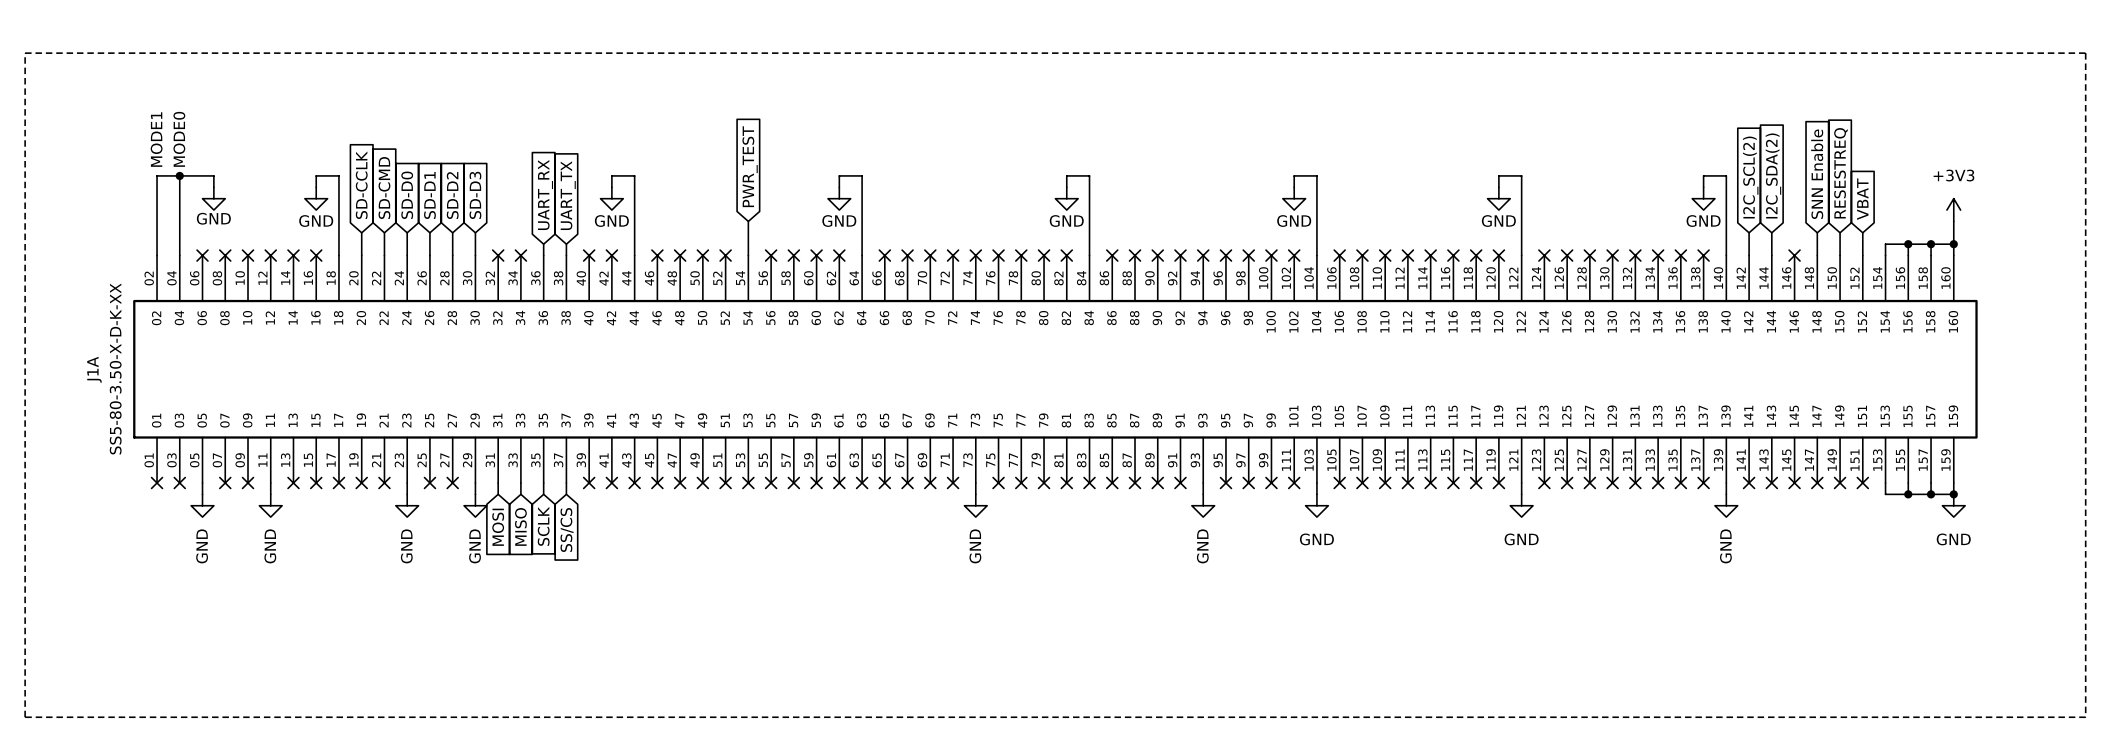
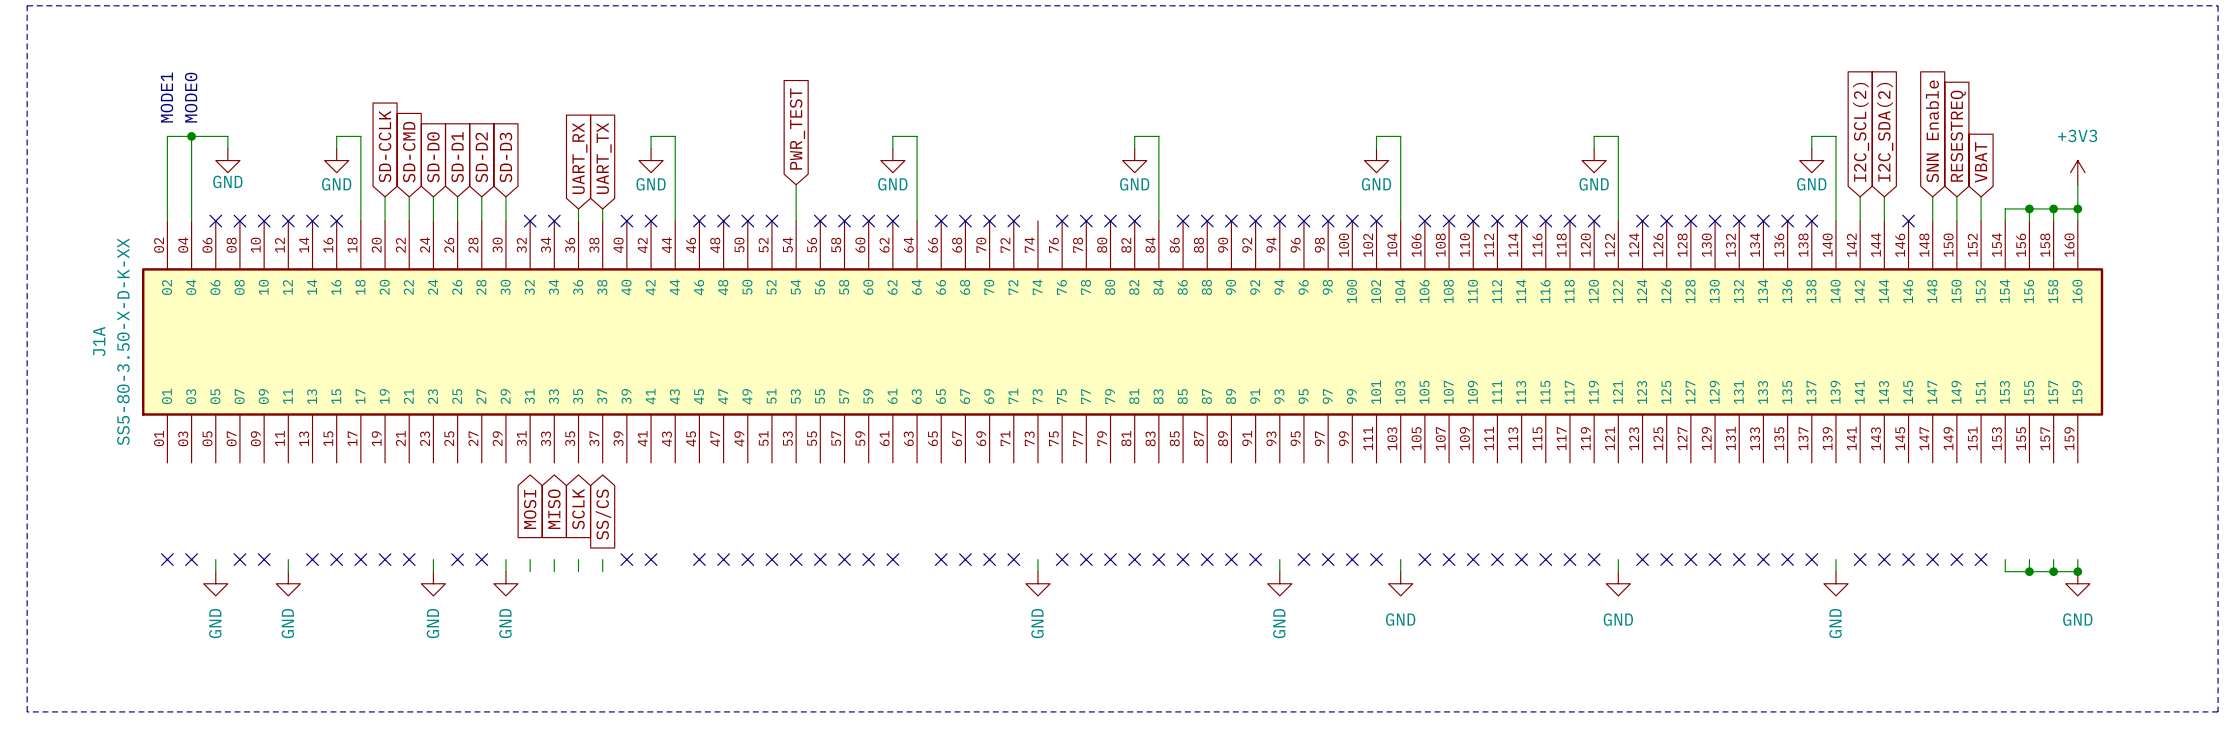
no-connect mark: (975, 255) -> none
no-connect mark: (157, 482) -> none
no-connect mark: (179, 482) -> none
wire: (202, 482) (202, 494) -> (215, 559) (215, 571)
no-connect mark: (225, 482) -> none
no-connect mark: (248, 482) -> none
wire: (270, 482) (270, 494) -> (288, 559) (288, 571)
no-connect mark: (293, 482) -> none
no-connect mark: (316, 482) -> none
no-connect mark: (338, 482) -> none
no-connect mark: (361, 482) -> none
no-connect mark: (384, 482) -> none
wire: (407, 482) (407, 494) -> (433, 559) (433, 571)
no-connect mark: (429, 482) -> none
no-connect mark: (452, 482) -> none
wire: (475, 482) (475, 494) -> (505, 559) (505, 571)
wire: (498, 482) (498, 494) -> (530, 559) (530, 571)
wire: (520, 482) (520, 494) -> (554, 559) (554, 571)
wire: (543, 482) (543, 494) -> (578, 559) (578, 571)
wire: (566, 482) (566, 494) -> (602, 559) (602, 571)
no-connect mark: (589, 482) -> none
no-connect mark: (611, 482) -> none
no-connect mark: (634, 482) -> none
no-connect mark: (657, 482) -> none
no-connect mark: (680, 482) -> none
no-connect mark: (702, 482) -> none
no-connect mark: (725, 482) -> none
no-connect mark: (748, 482) -> none
no-connect mark: (771, 482) -> none
no-connect mark: (793, 482) -> none
no-connect mark: (816, 482) -> none
no-connect mark: (839, 482) -> none
no-connect mark: (862, 482) -> none
no-connect mark: (884, 482) -> none
no-connect mark: (907, 482) -> none
no-connect mark: (930, 482) -> none
no-connect mark: (953, 482) -> none
wire: (975, 482) (975, 494) -> (1037, 559) (1037, 571)
no-connect mark: (998, 482) -> none
no-connect mark: (1021, 482) -> none
no-connect mark: (1044, 482) -> none
no-connect mark: (1066, 482) -> none
no-connect mark: (1089, 482) -> none
no-connect mark: (1112, 482) -> none
no-connect mark: (1135, 482) -> none
no-connect mark: (1157, 482) -> none
no-connect mark: (1180, 482) -> none
wire: (1203, 482) (1203, 494) -> (1279, 559) (1279, 571)
no-connect mark: (1225, 482) -> none
no-connect mark: (1248, 482) -> none
no-connect mark: (1271, 482) -> none
no-connect mark: (1294, 482) -> none
wire: (1316, 482) (1316, 494) -> (1400, 559) (1400, 571)
no-connect mark: (1339, 482) -> none
no-connect mark: (1362, 482) -> none
no-connect mark: (1385, 482) -> none
no-connect mark: (1407, 482) -> none
no-connect mark: (1430, 482) -> none
no-connect mark: (1453, 482) -> none
no-connect mark: (1476, 482) -> none
no-connect mark: (1498, 482) -> none
wire: (1521, 482) (1521, 494) -> (1618, 559) (1618, 571)
no-connect mark: (1544, 482) -> none
no-connect mark: (1567, 482) -> none
no-connect mark: (1589, 482) -> none
no-connect mark: (1612, 482) -> none
no-connect mark: (1635, 482) -> none
no-connect mark: (1658, 482) -> none
no-connect mark: (1680, 482) -> none
no-connect mark: (1703, 482) -> none
wire: (1726, 482) (1726, 494) -> (1835, 559) (1835, 571)
no-connect mark: (1749, 482) -> none
no-connect mark: (1771, 482) -> none
no-connect mark: (1794, 482) -> none
no-connect mark: (1817, 482) -> none
no-connect mark: (1840, 482) -> none
no-connect mark: (1862, 482) -> none
wire: (1885, 482) (1885, 494) (1953, 494) (1953, 482) -> (2005, 559) (2005, 571) (2077, 571) (2077, 559)
wire: (1908, 482) (1908, 494) -> (2029, 559) (2029, 571)
wire: (1931, 482) (1931, 494) -> (2053, 559) (2053, 571)
junction: (1908, 494) -> none
junction: (1931, 494) -> none
junction: (1953, 494) -> none
power symbol: GND (202, 505) -> none
power symbol: GND (270, 505) -> none
power symbol: GND (407, 505) -> none
power symbol: GND (475, 505) -> none
power symbol position: GND (975, 505) -> GND (1037, 583)
power symbol: GND (1203, 505) -> none
power symbol: GND (1316, 505) -> none
power symbol position: GND (1521, 505) -> GND (1618, 583)
power symbol position: GND (1726, 505) -> GND (1835, 583)
power symbol position: GND (1953, 505) -> GND (2077, 583)
no-connect mark: none -> (167, 559)
no-connect mark: none -> (191, 559)
no-connect mark: none -> (239, 559)
no-connect mark: none -> (264, 559)
no-connect mark: none -> (312, 559)
no-connect mark: none -> (336, 559)
no-connect mark: none -> (360, 559)
no-connect mark: none -> (385, 559)
no-connect mark: none -> (409, 559)
no-connect mark: none -> (457, 559)
no-connect mark: none -> (481, 559)
no-connect mark: none -> (626, 559)
no-connect mark: none -> (651, 559)
no-connect mark: none -> (699, 559)
no-connect mark: none -> (723, 559)
no-connect mark: none -> (747, 559)
no-connect mark: none -> (771, 559)
no-connect mark: none -> (796, 559)
no-connect mark: none -> (820, 559)
no-connect mark: none -> (844, 559)
no-connect mark: none -> (868, 559)
no-connect mark: none -> (892, 559)
no-connect mark: none -> (941, 559)
no-connect mark: none -> (965, 559)
no-connect mark: none -> (989, 559)
no-connect mark: none -> (1013, 559)
no-connect mark: none -> (1062, 559)
no-connect mark: none -> (1086, 559)
no-connect mark: none -> (1110, 559)
no-connect mark: none -> (1134, 559)
no-connect mark: none -> (1158, 559)
no-connect mark: none -> (1183, 559)
no-connect mark: none -> (1207, 559)
no-connect mark: none -> (1231, 559)
no-connect mark: none -> (1255, 559)
no-connect mark: none -> (1303, 559)
no-connect mark: none -> (1328, 559)
no-connect mark: none -> (1352, 559)
no-connect mark: none -> (1376, 559)
no-connect mark: none -> (1424, 559)
no-connect mark: none -> (1449, 559)
no-connect mark: none -> (1473, 559)
no-connect mark: none -> (1497, 559)
no-connect mark: none -> (1521, 559)
no-connect mark: none -> (1545, 559)
no-connect mark: none -> (1569, 559)
no-connect mark: none -> (1594, 559)
no-connect mark: none -> (1642, 559)
no-connect mark: none -> (1666, 559)
no-connect mark: none -> (1690, 559)
no-connect mark: none -> (1715, 559)
no-connect mark: none -> (1739, 559)
no-connect mark: none -> (1763, 559)
no-connect mark: none -> (1787, 559)
no-connect mark: none -> (1811, 559)
no-connect mark: none -> (1860, 559)
no-connect mark: none -> (1884, 559)
no-connect mark: none -> (1908, 559)
no-connect mark: none -> (1932, 559)
no-connect mark: none -> (1956, 559)
no-connect mark: none -> (1981, 559)
junction: none -> (2029, 571)
junction: none -> (2053, 571)
junction: none -> (2077, 571)
power symbol: none -> GND (215, 583)
power symbol: none -> GND (288, 583)
power symbol: none -> GND (433, 583)
power symbol: none -> GND (505, 583)
power symbol: none -> GND (1279, 583)
power symbol: none -> GND (1400, 583)

